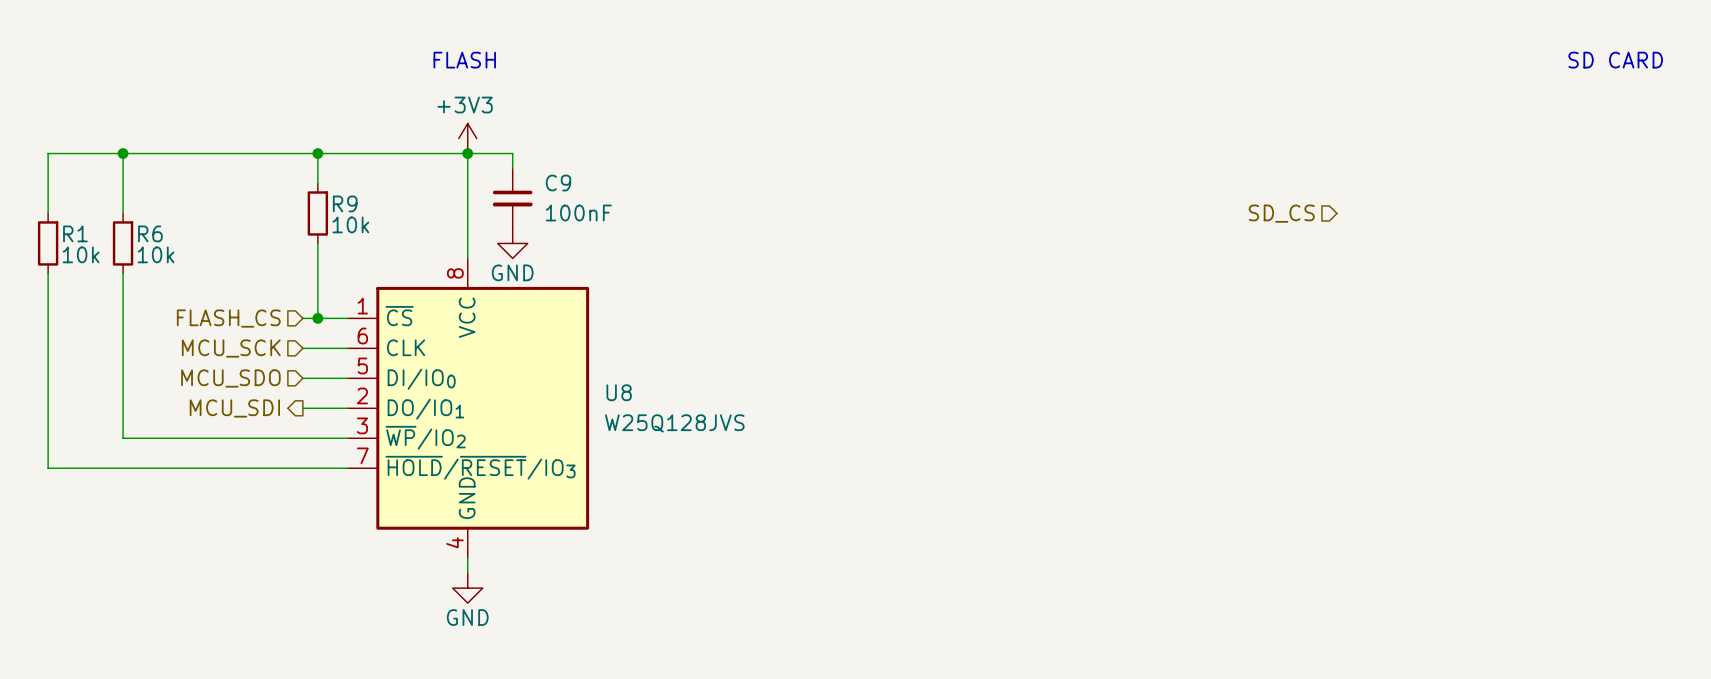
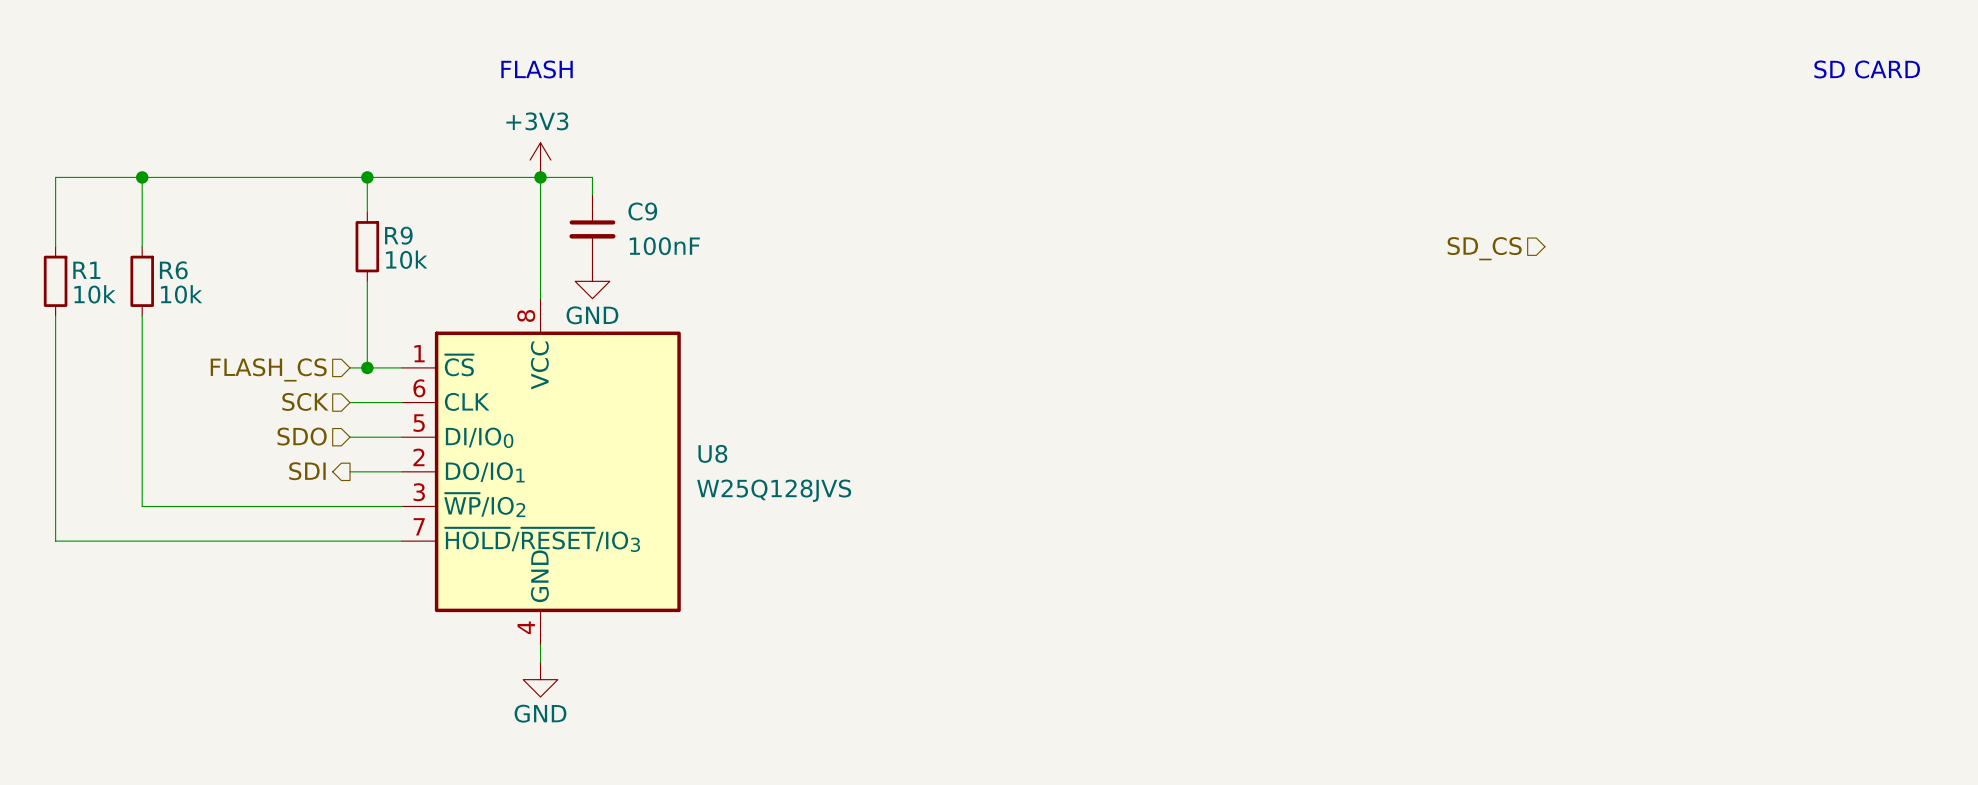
hierarchical label: MCU_SCK (231, 348) -> SCK (305, 401)
hierarchical label: MCU_SDO (230, 378) -> SDO (302, 436)
hierarchical label: MCU_SDI (234, 408) -> SDI (307, 471)

